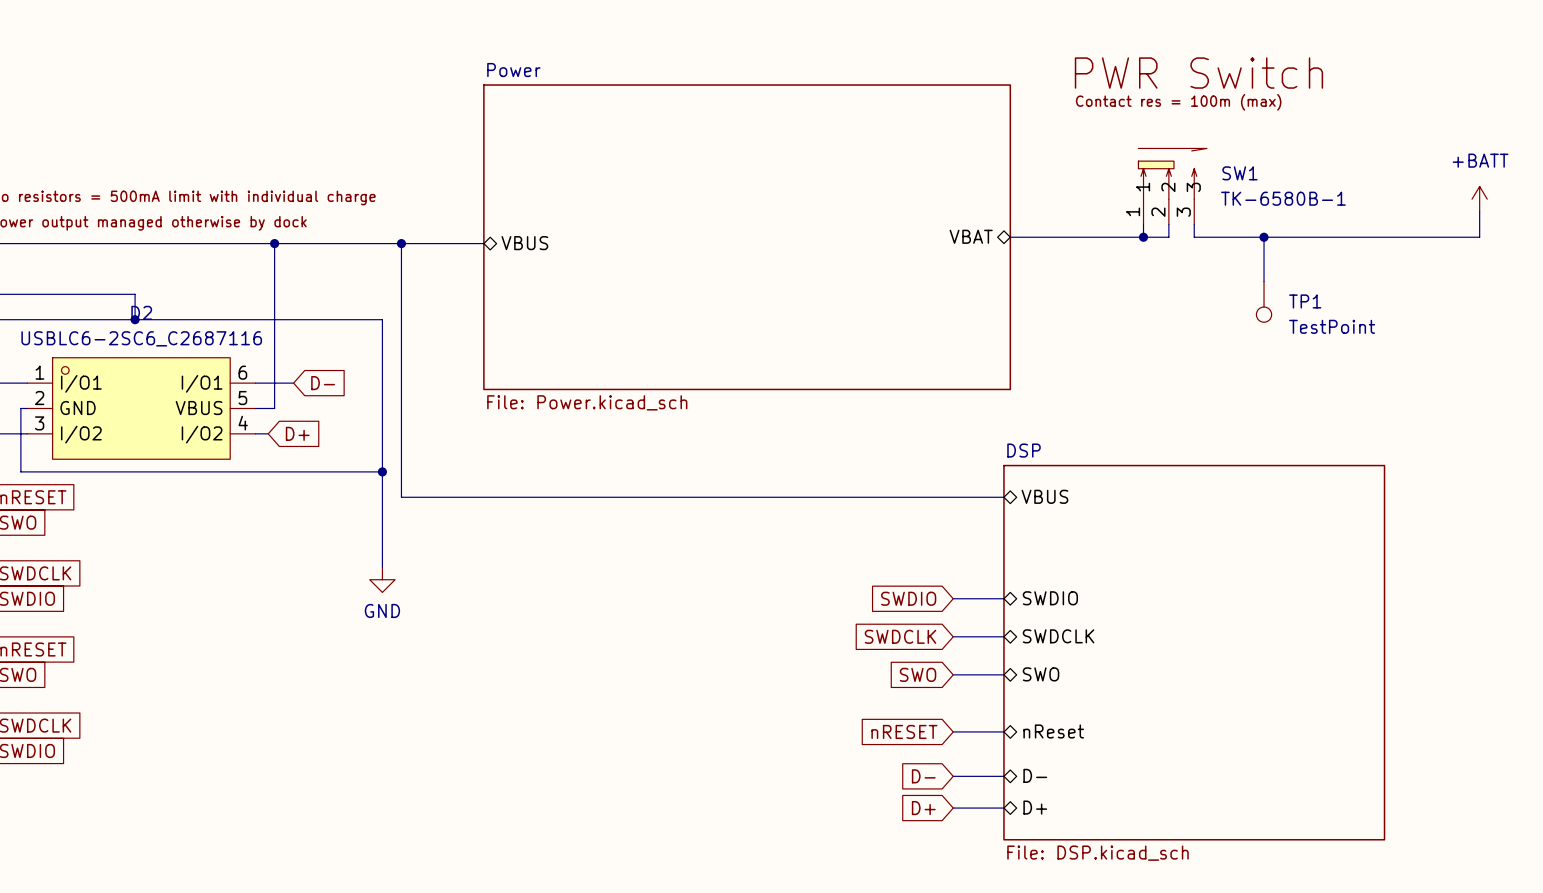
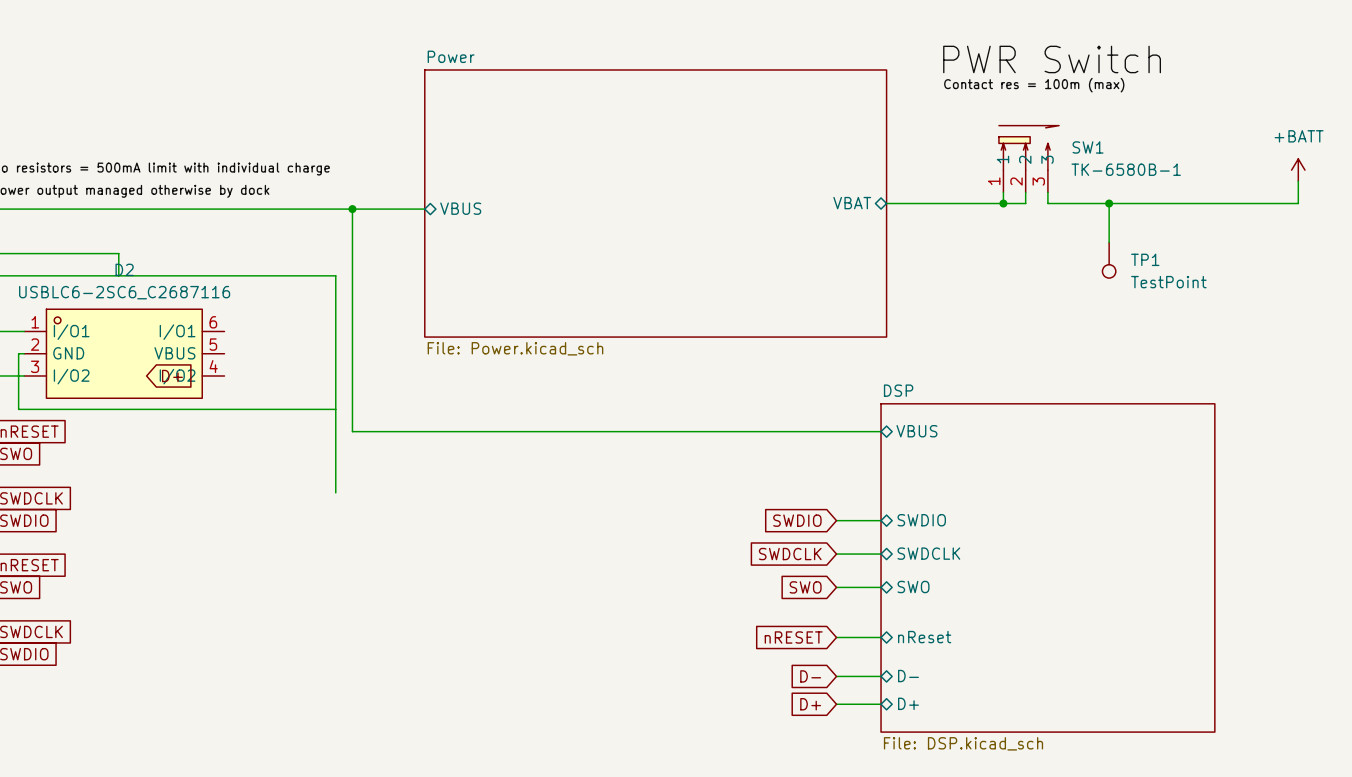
wire: (274, 243) (274, 408) (255, 408) -> none
junction: (274, 243) -> none
junction: (135, 319) -> none
wire: (255, 383) (293, 383) -> none
global label: D- (323, 383) -> none
wire: (255, 433) (268, 433) -> none
global label position: D+ (297, 433) -> D+ (172, 375)
junction: (382, 471) -> none
power symbol: GND (382, 579) -> none

